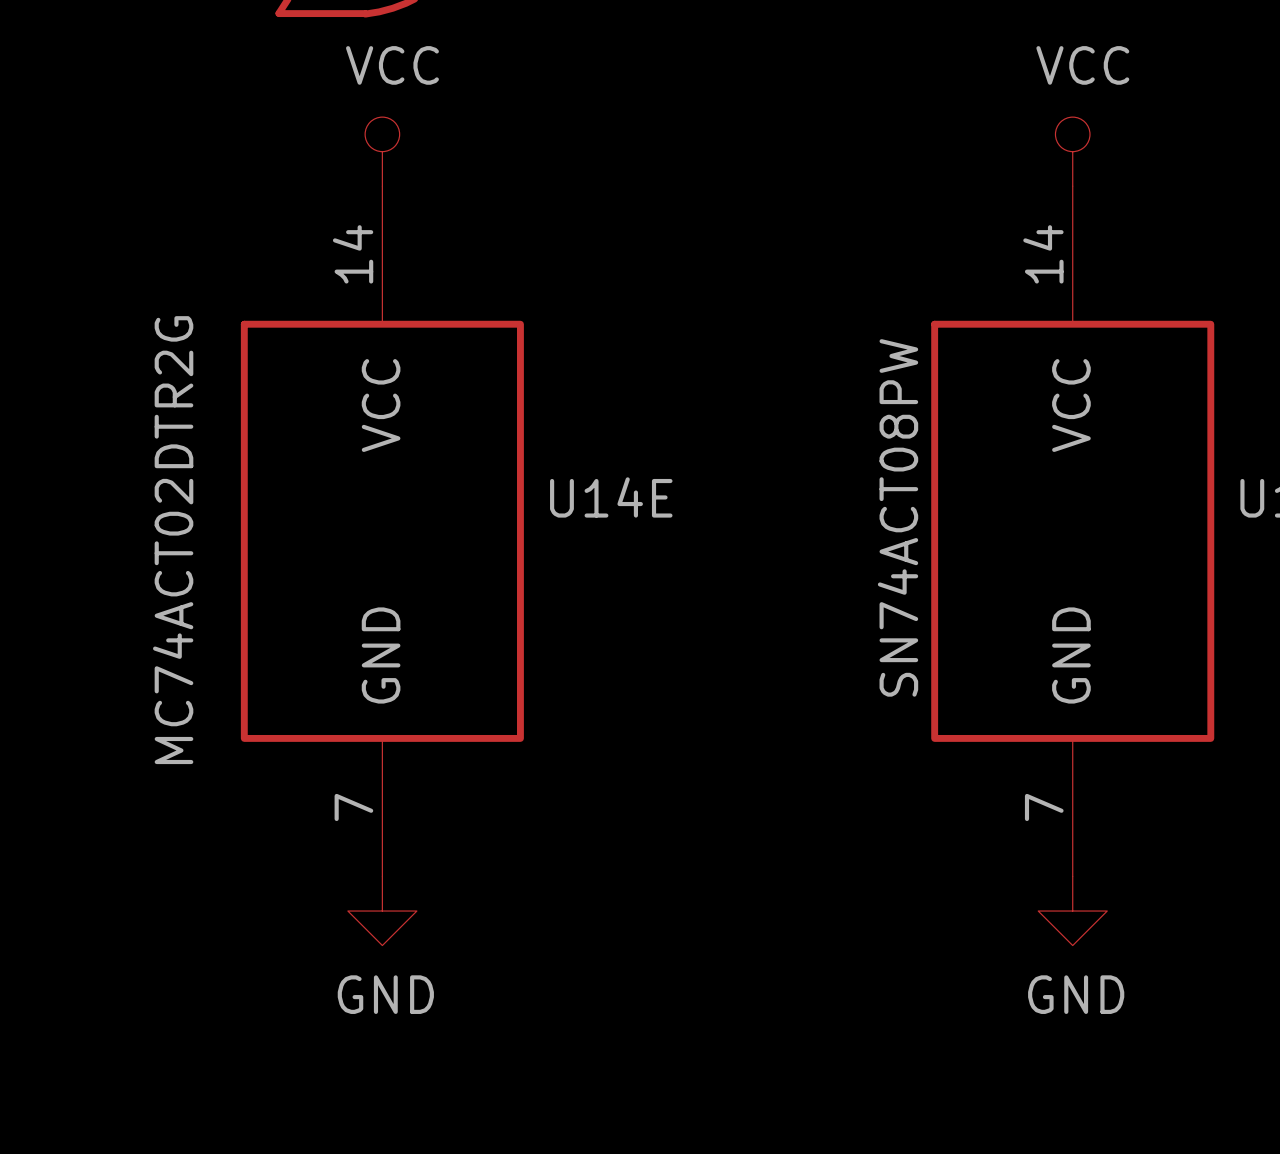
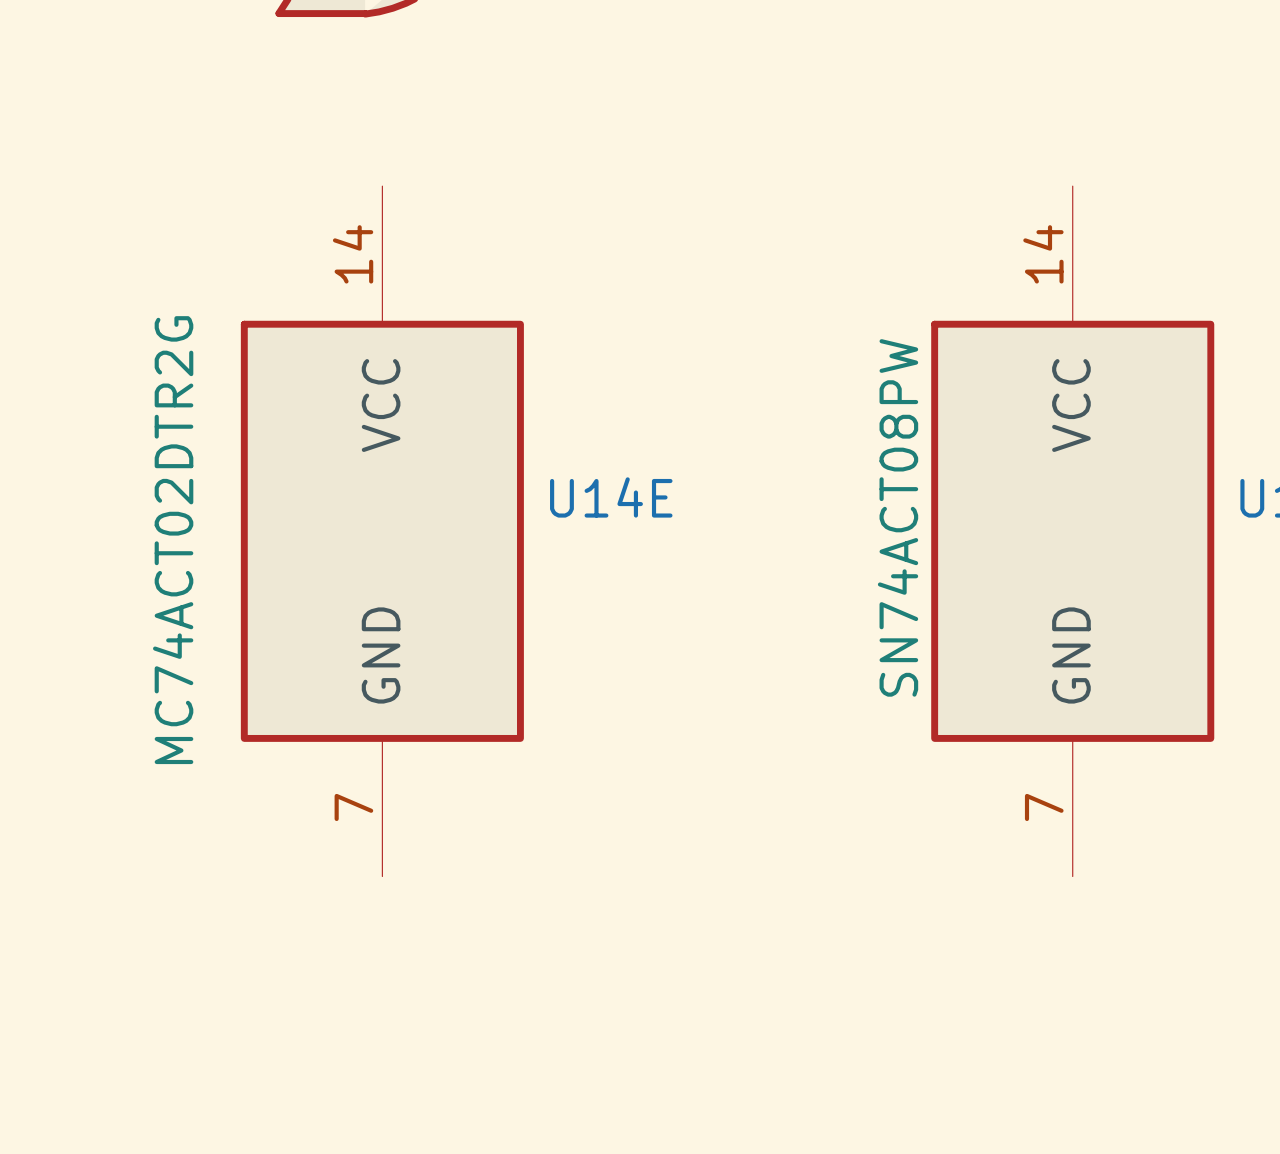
power symbol: VCC (382, 151) -> none
power symbol: VCC (1072, 151) -> none
power symbol: GND (382, 911) -> none
power symbol: GND (1072, 911) -> none

